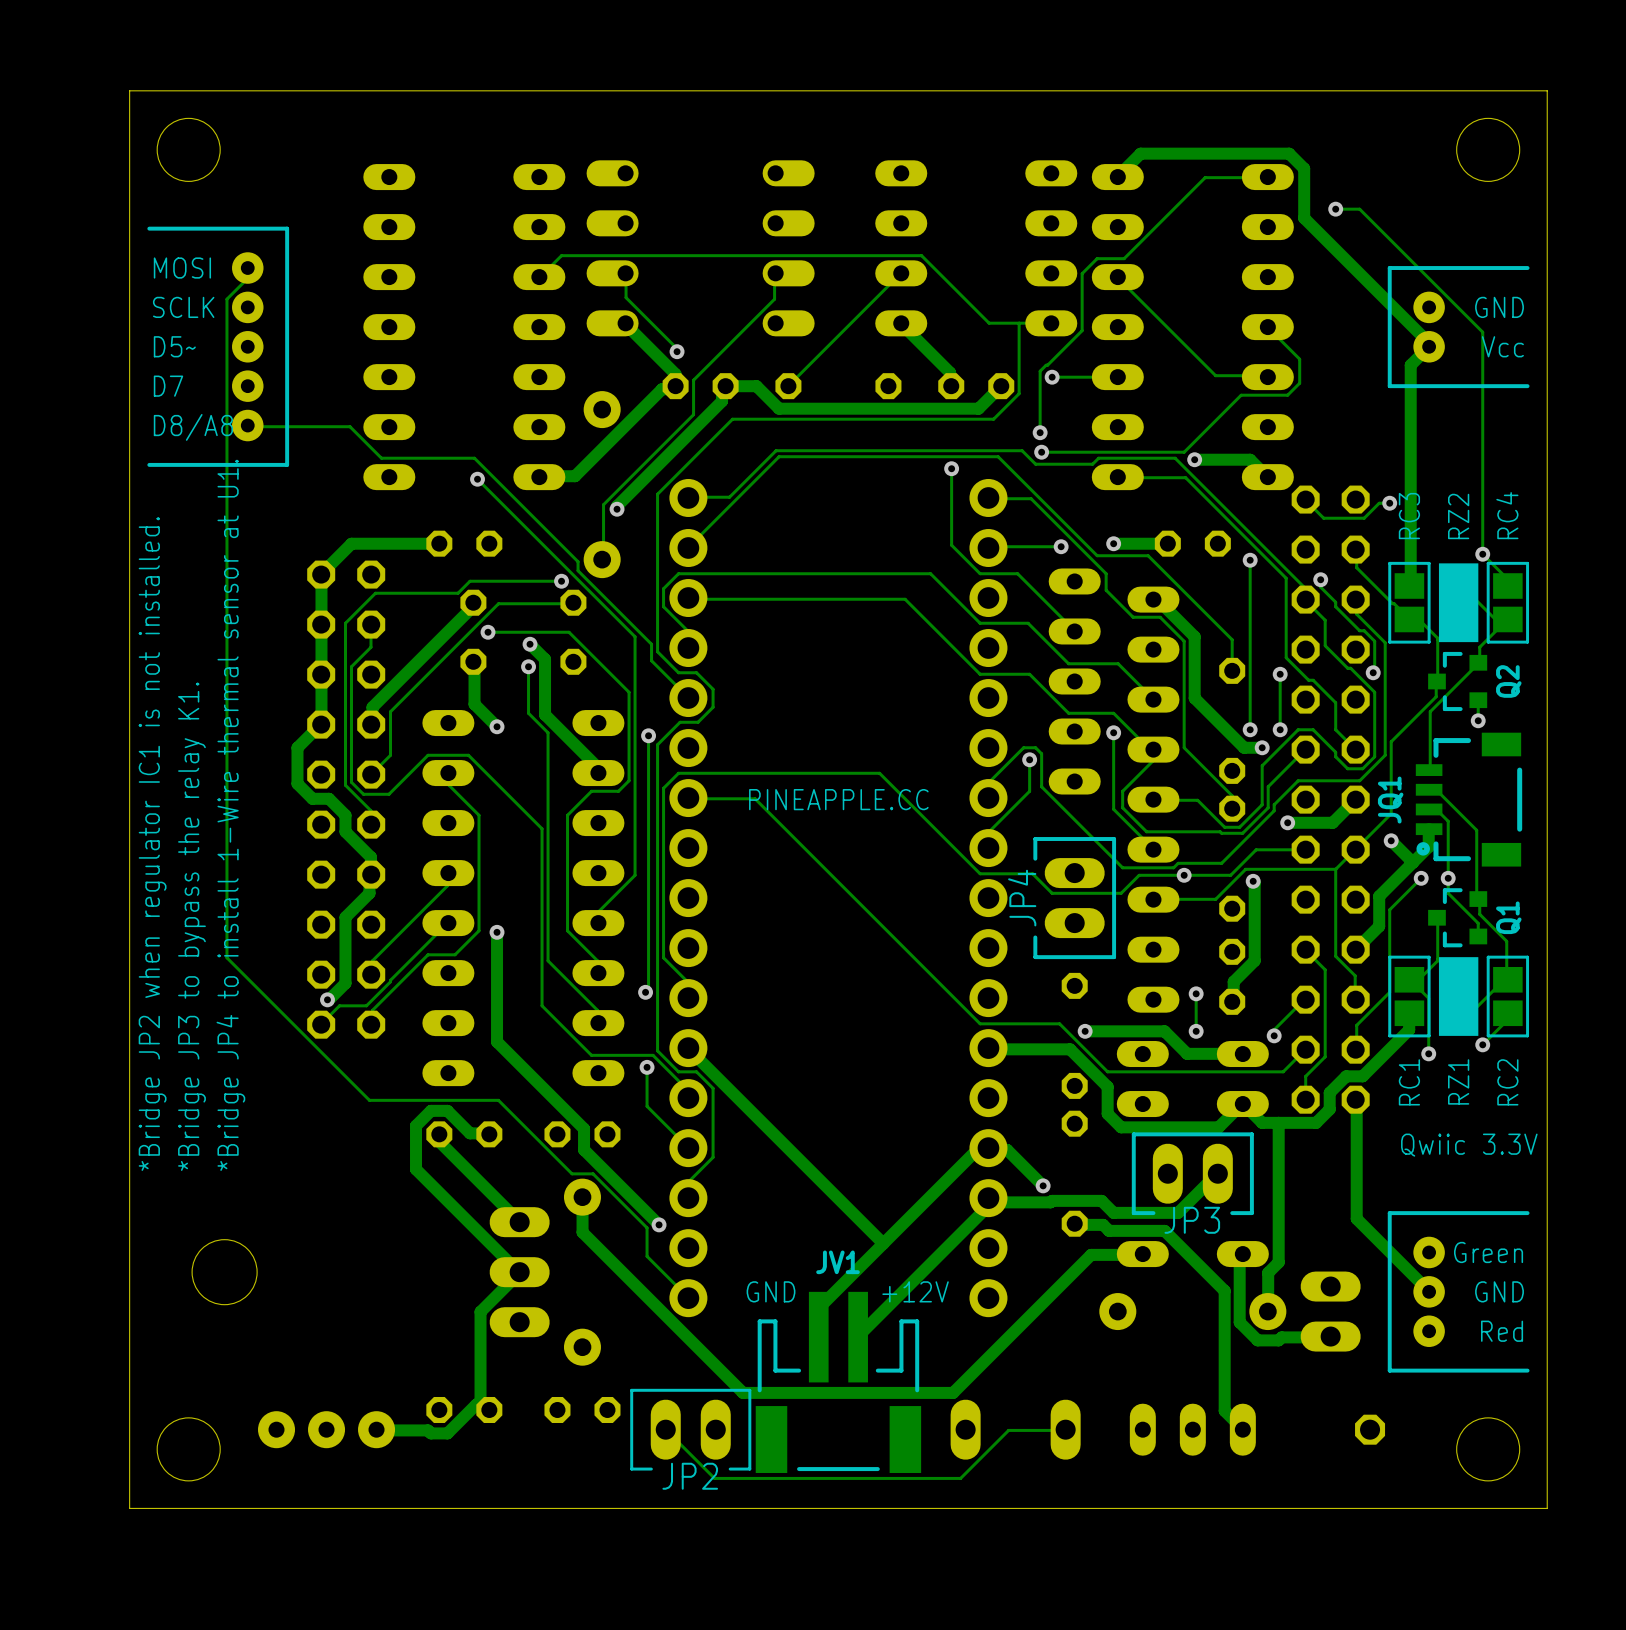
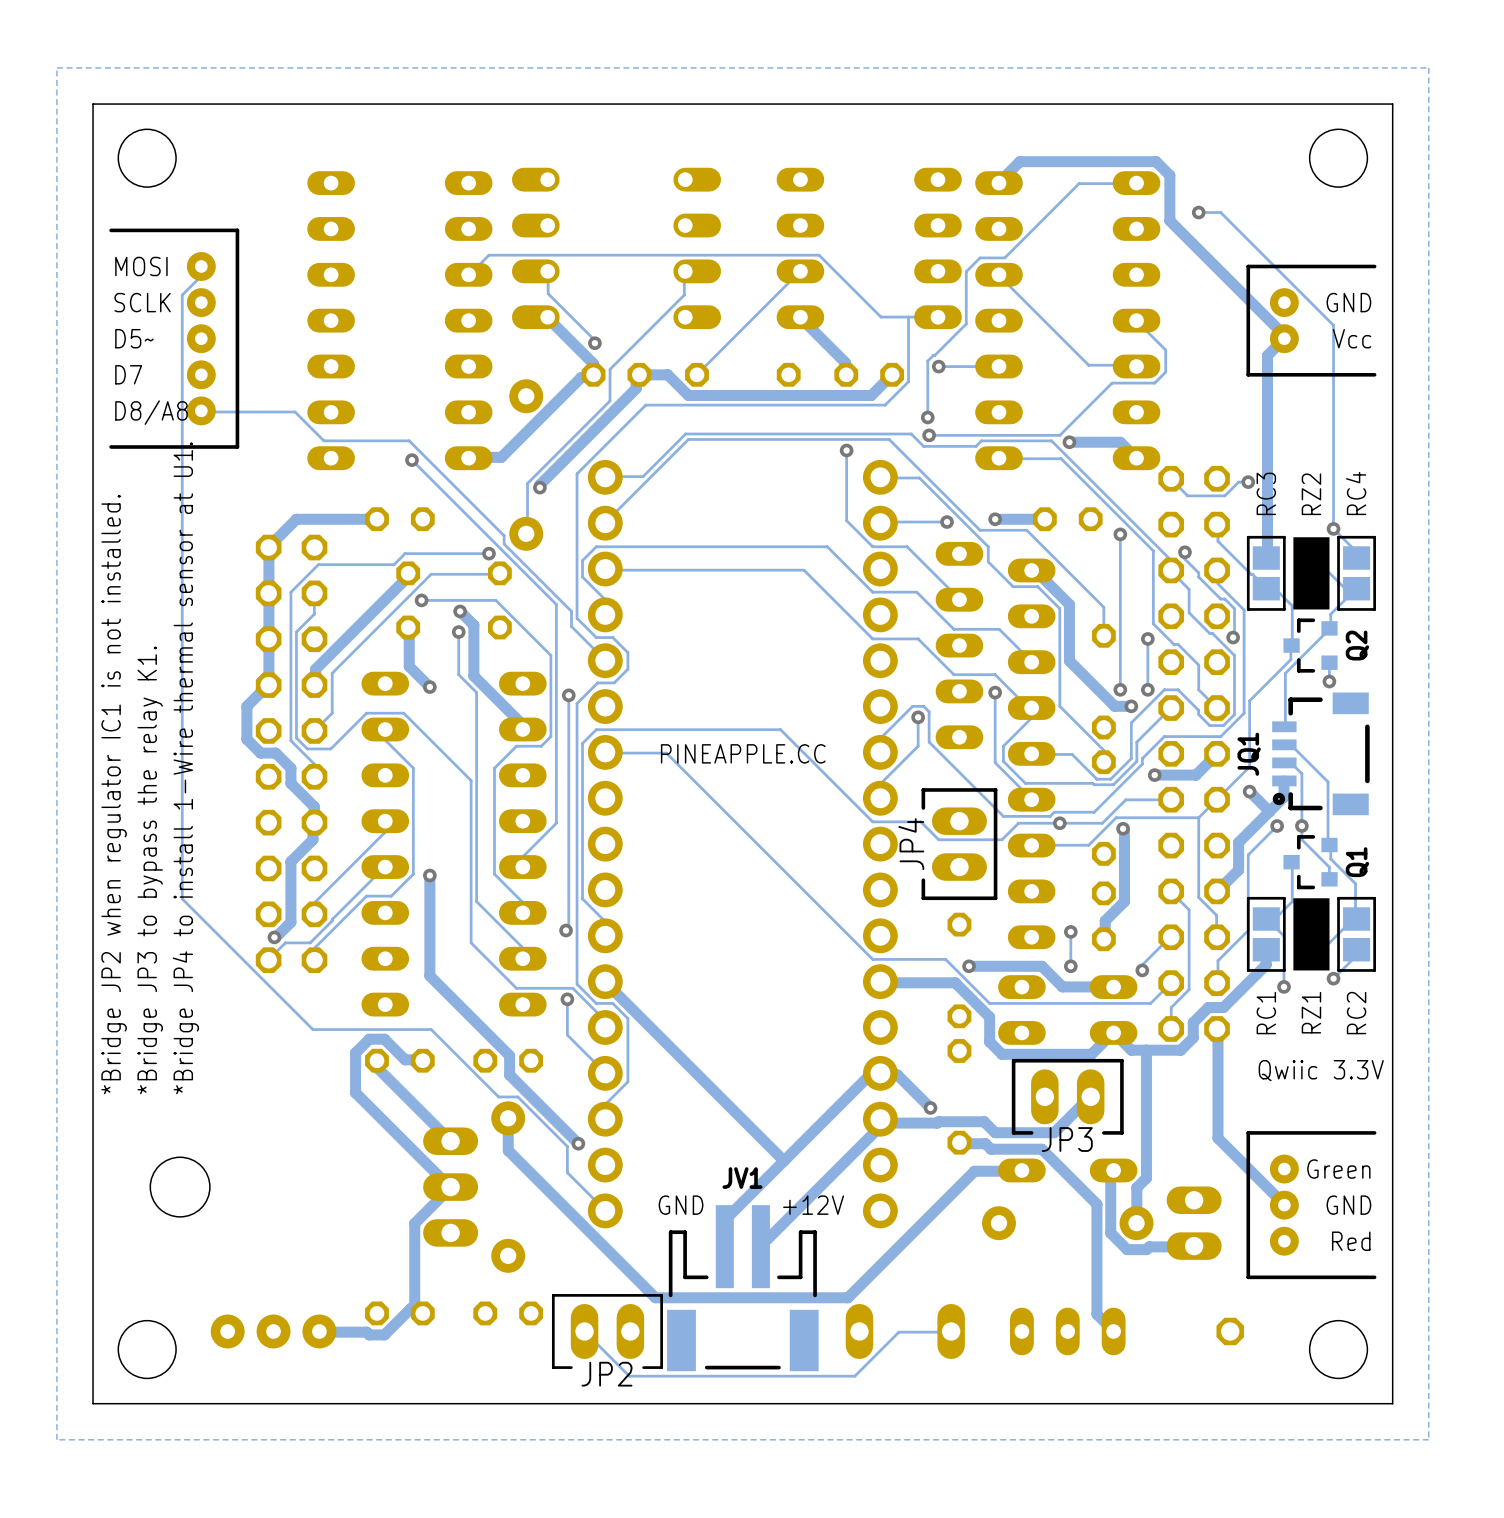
zone outline: none -> (1428, 67) (56, 67) (56, 1439) (1428, 1439) (1428, 67)

